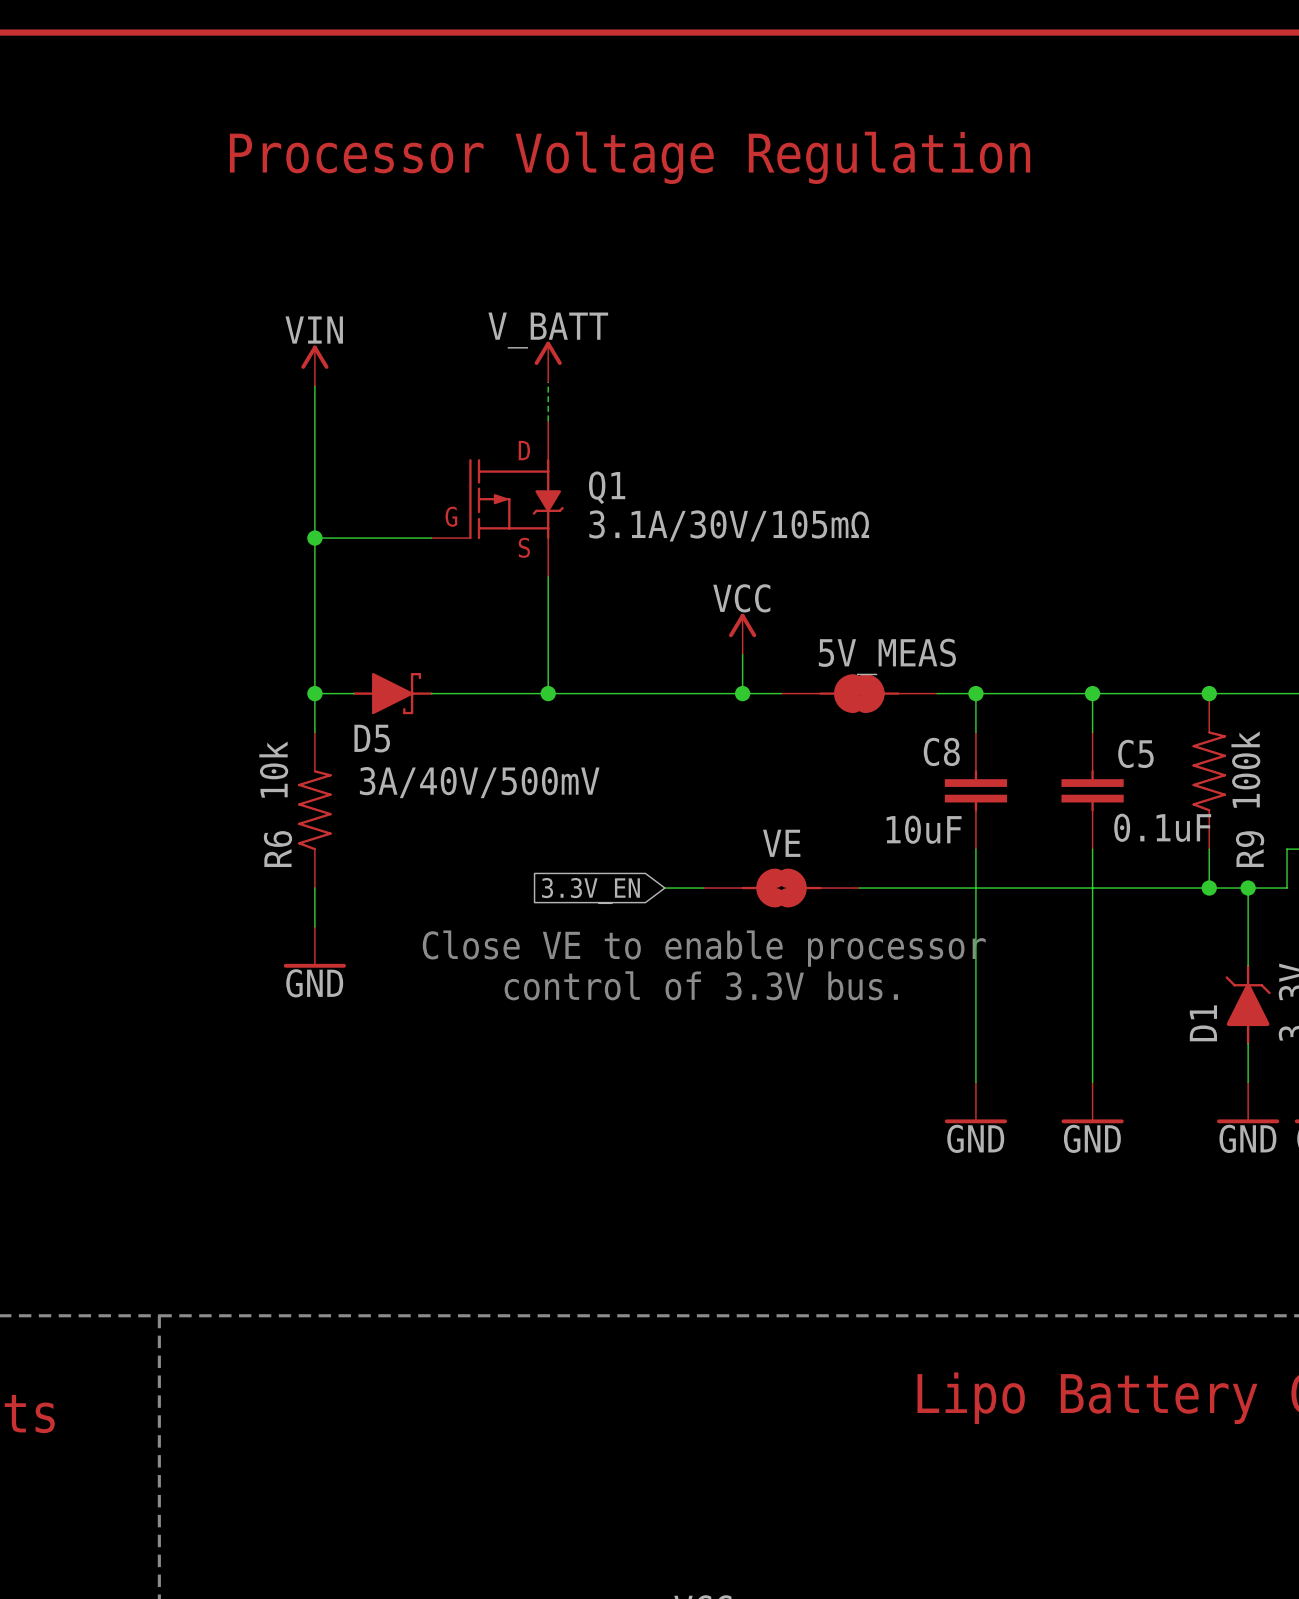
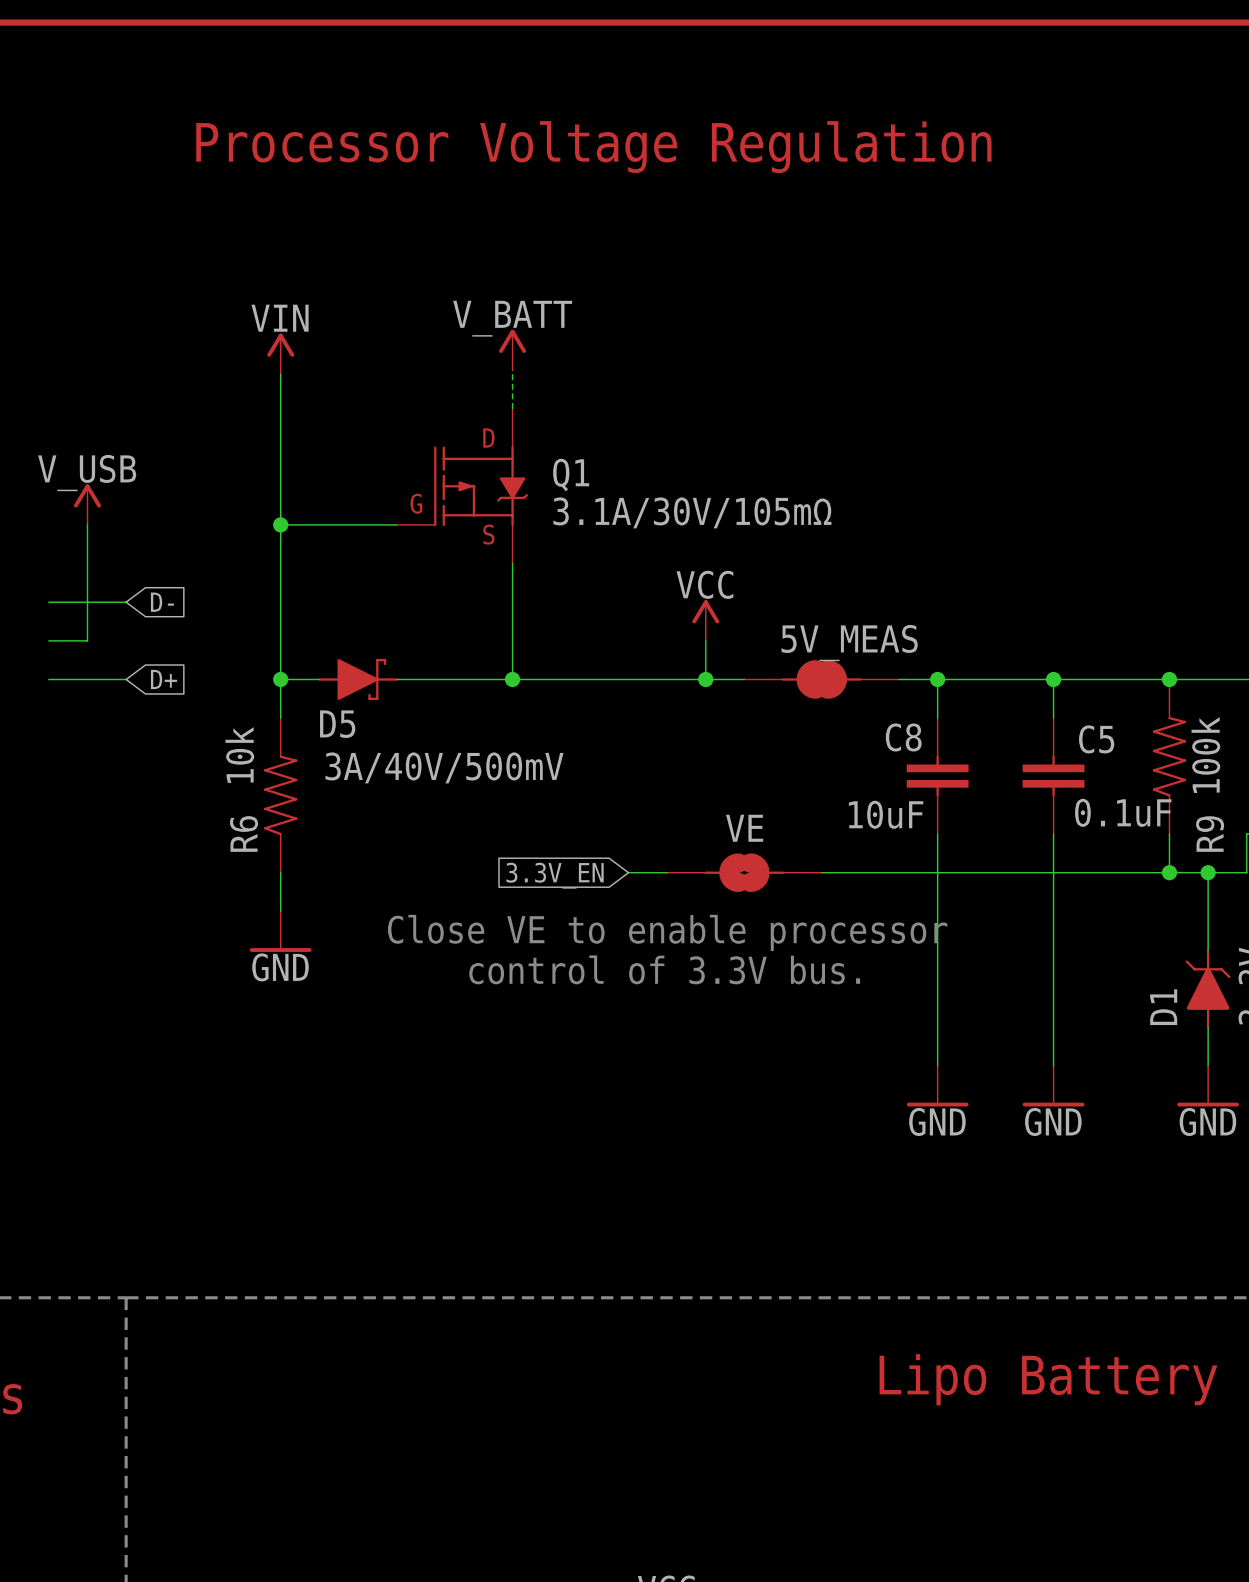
power symbol: none -> V_USB (87, 504)
wire: none -> (87, 524) (87, 640) (48, 640)
wire: none -> (48, 602) (126, 602)
global label: none -> D- (162, 602)
wire: none -> (48, 679) (126, 679)
global label: none -> D+ (163, 679)

